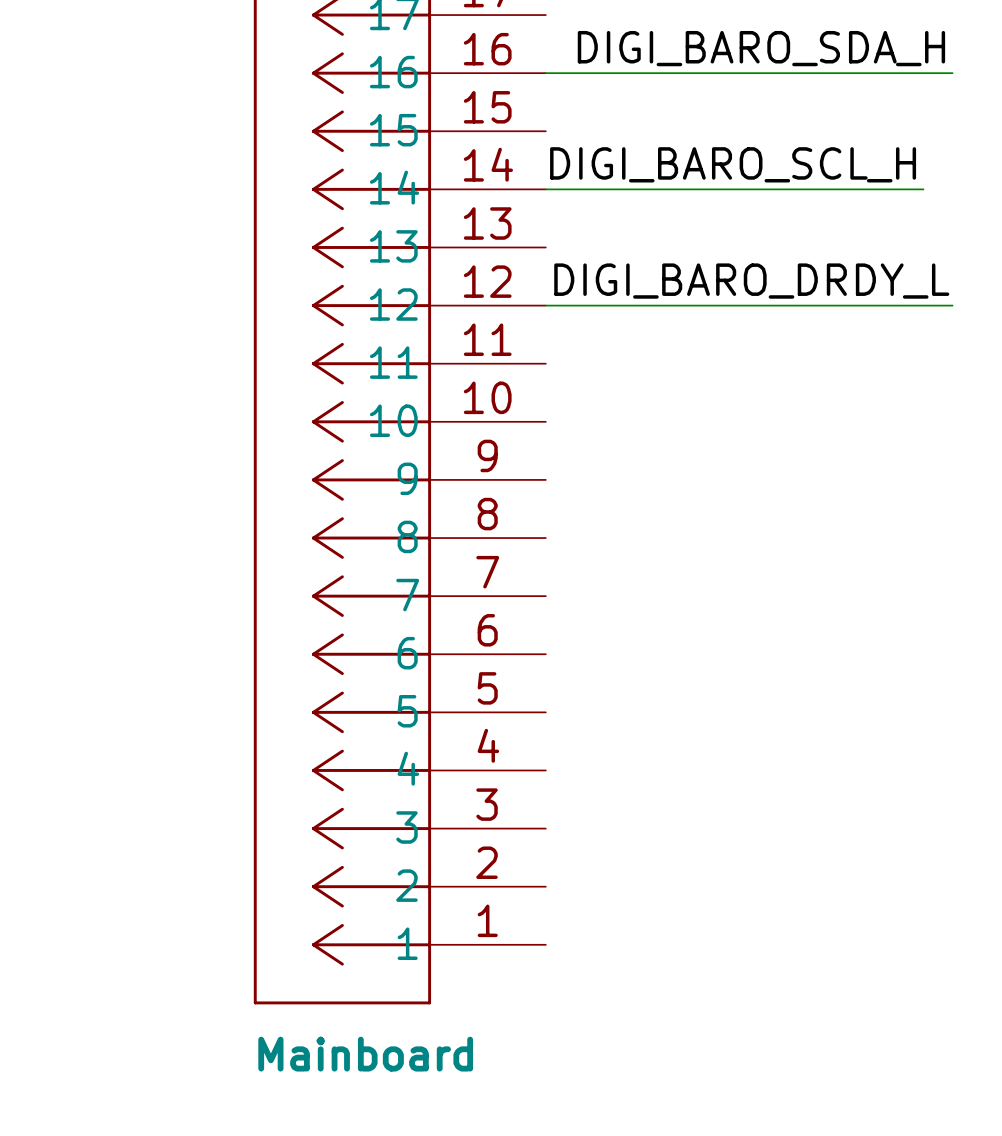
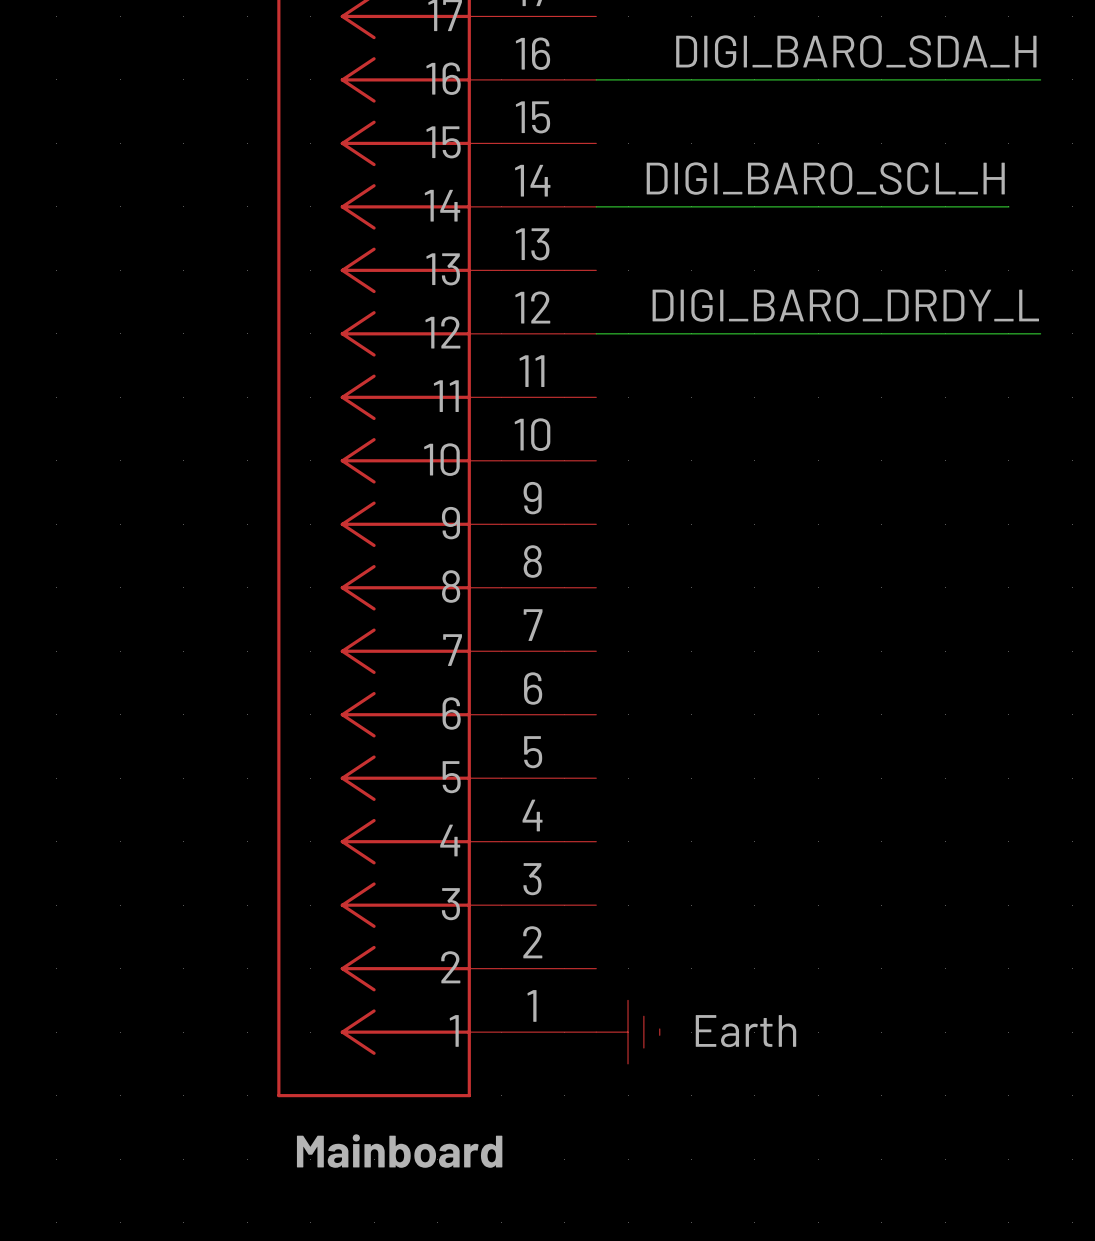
power symbol: none -> Earth (628, 1032)

